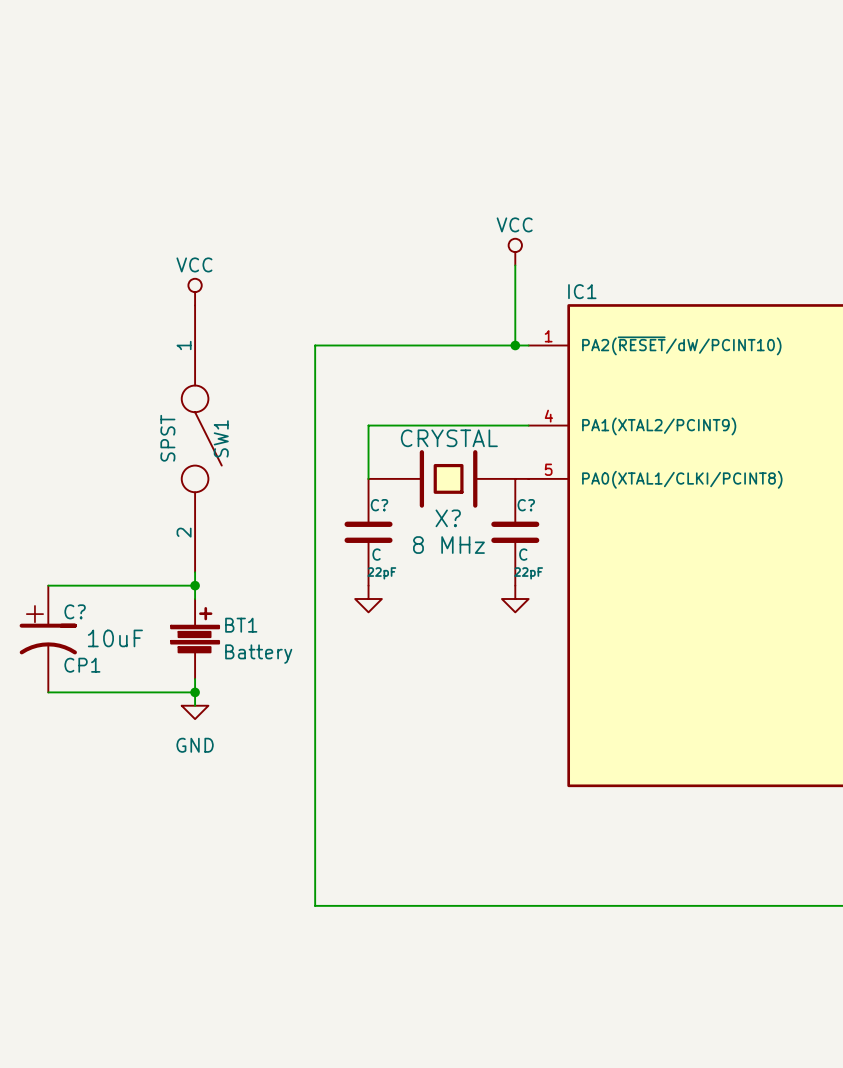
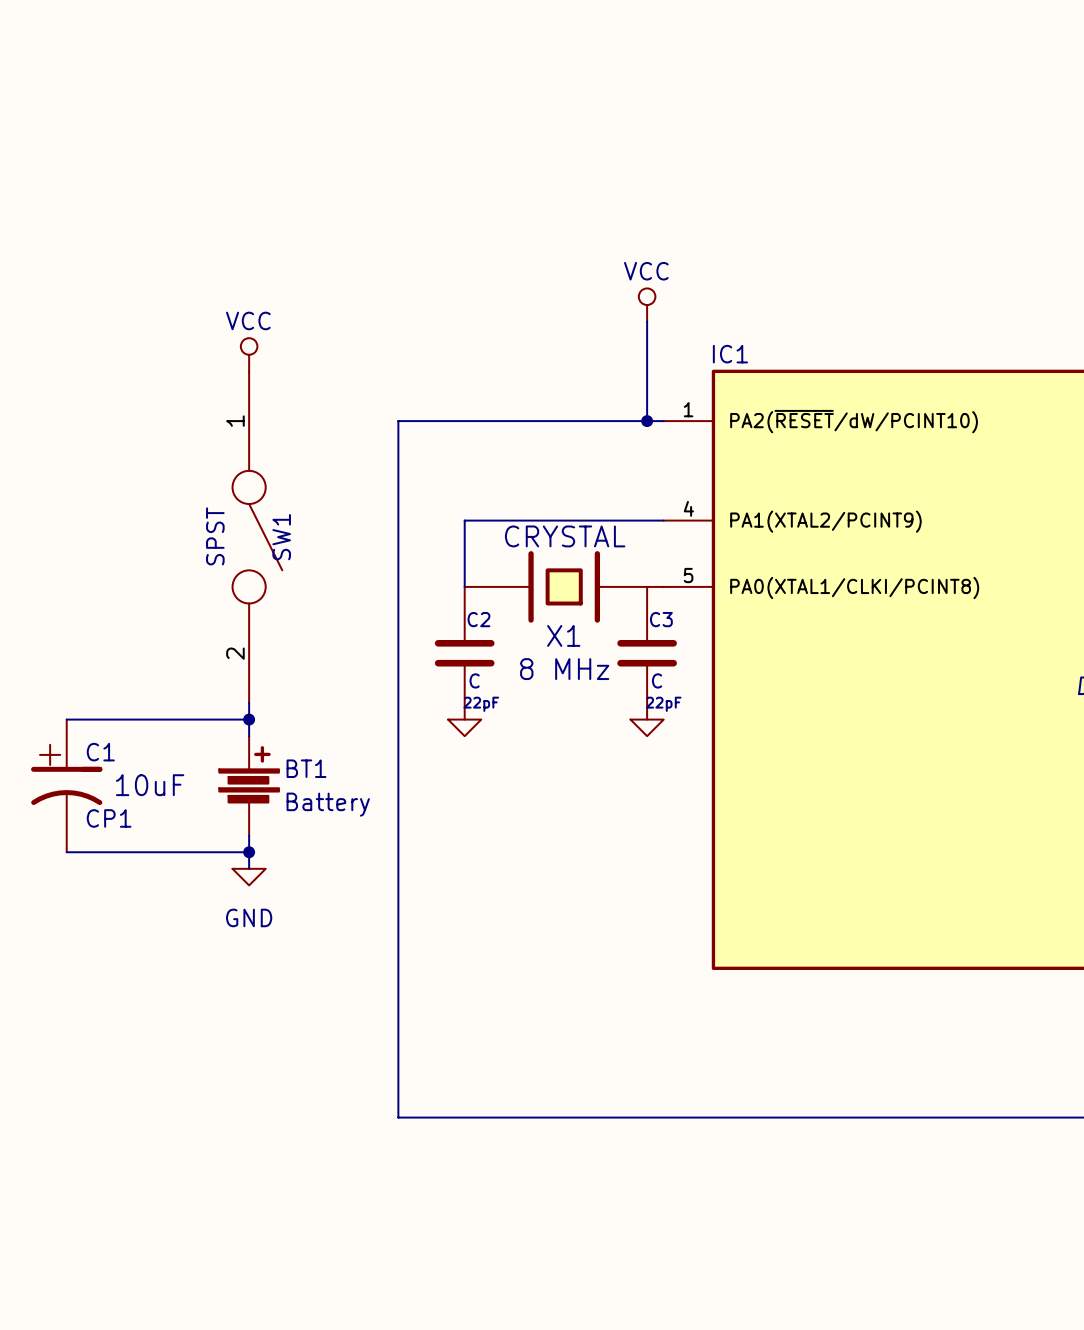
C? name: C? (379, 505) -> C2 (478, 619)
C? name: C? (526, 505) -> C3 (661, 619)
X? name: X? (448, 518) -> X1 (563, 635)
power symbol shape: [355, 585, 382, 613] -> [448, 719, 482, 737]
power symbol shape: [501, 585, 529, 613] -> [630, 719, 664, 737]
C? name: C? (75, 611) -> C1 (100, 752)

